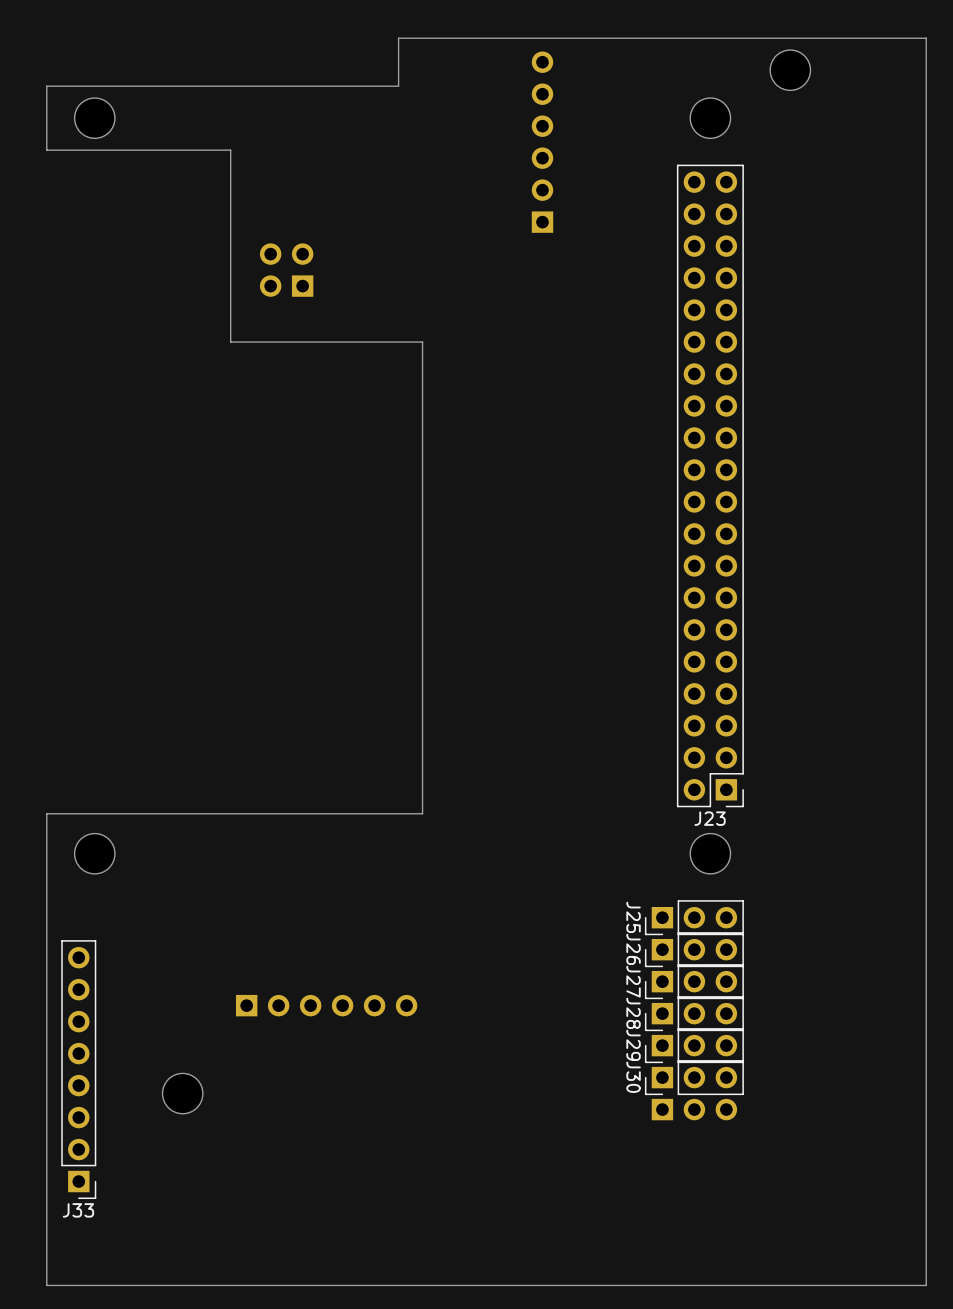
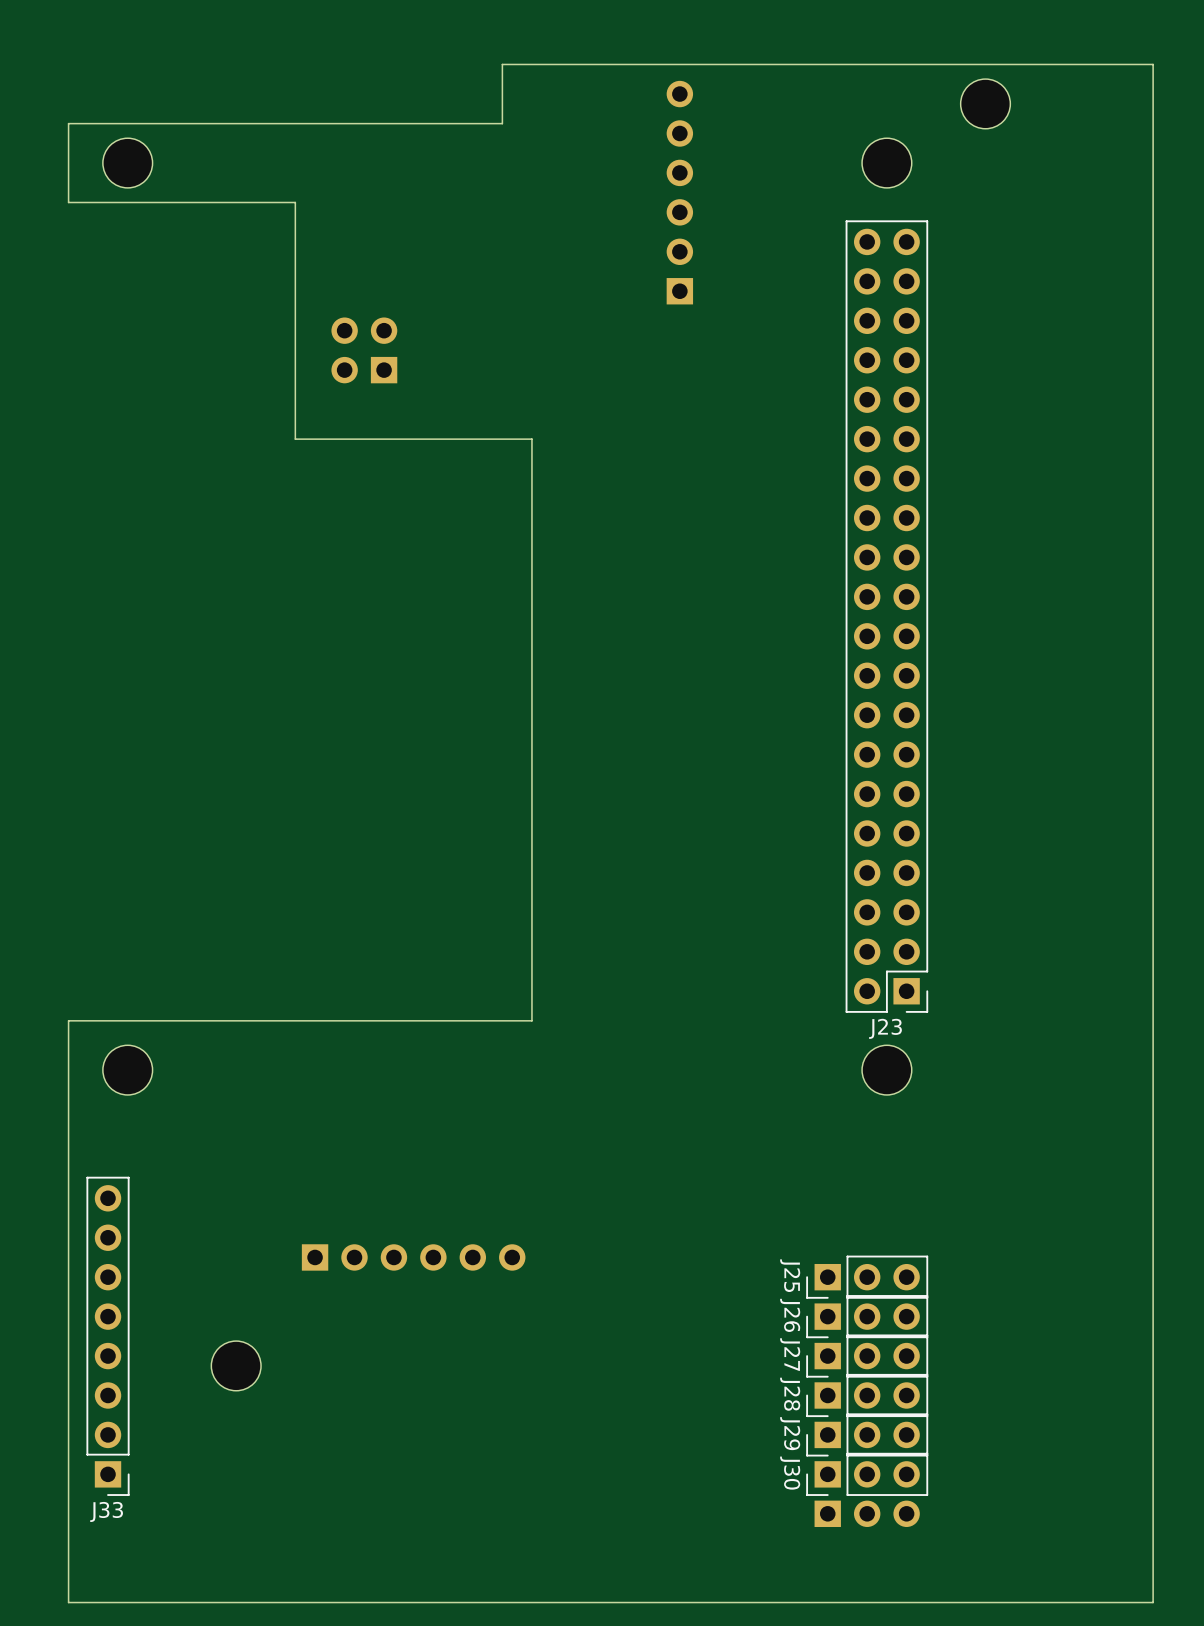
J25 position: (694, 917) -> (867, 1277)
J26 position: (694, 949) -> (867, 1316)
J27 position: (694, 981) -> (867, 1356)
J28 position: (694, 1013) -> (867, 1395)
J29 position: (694, 1045) -> (867, 1434)
J30 position: (694, 1077) -> (867, 1474)
part position: (694, 1109) -> (867, 1513)

